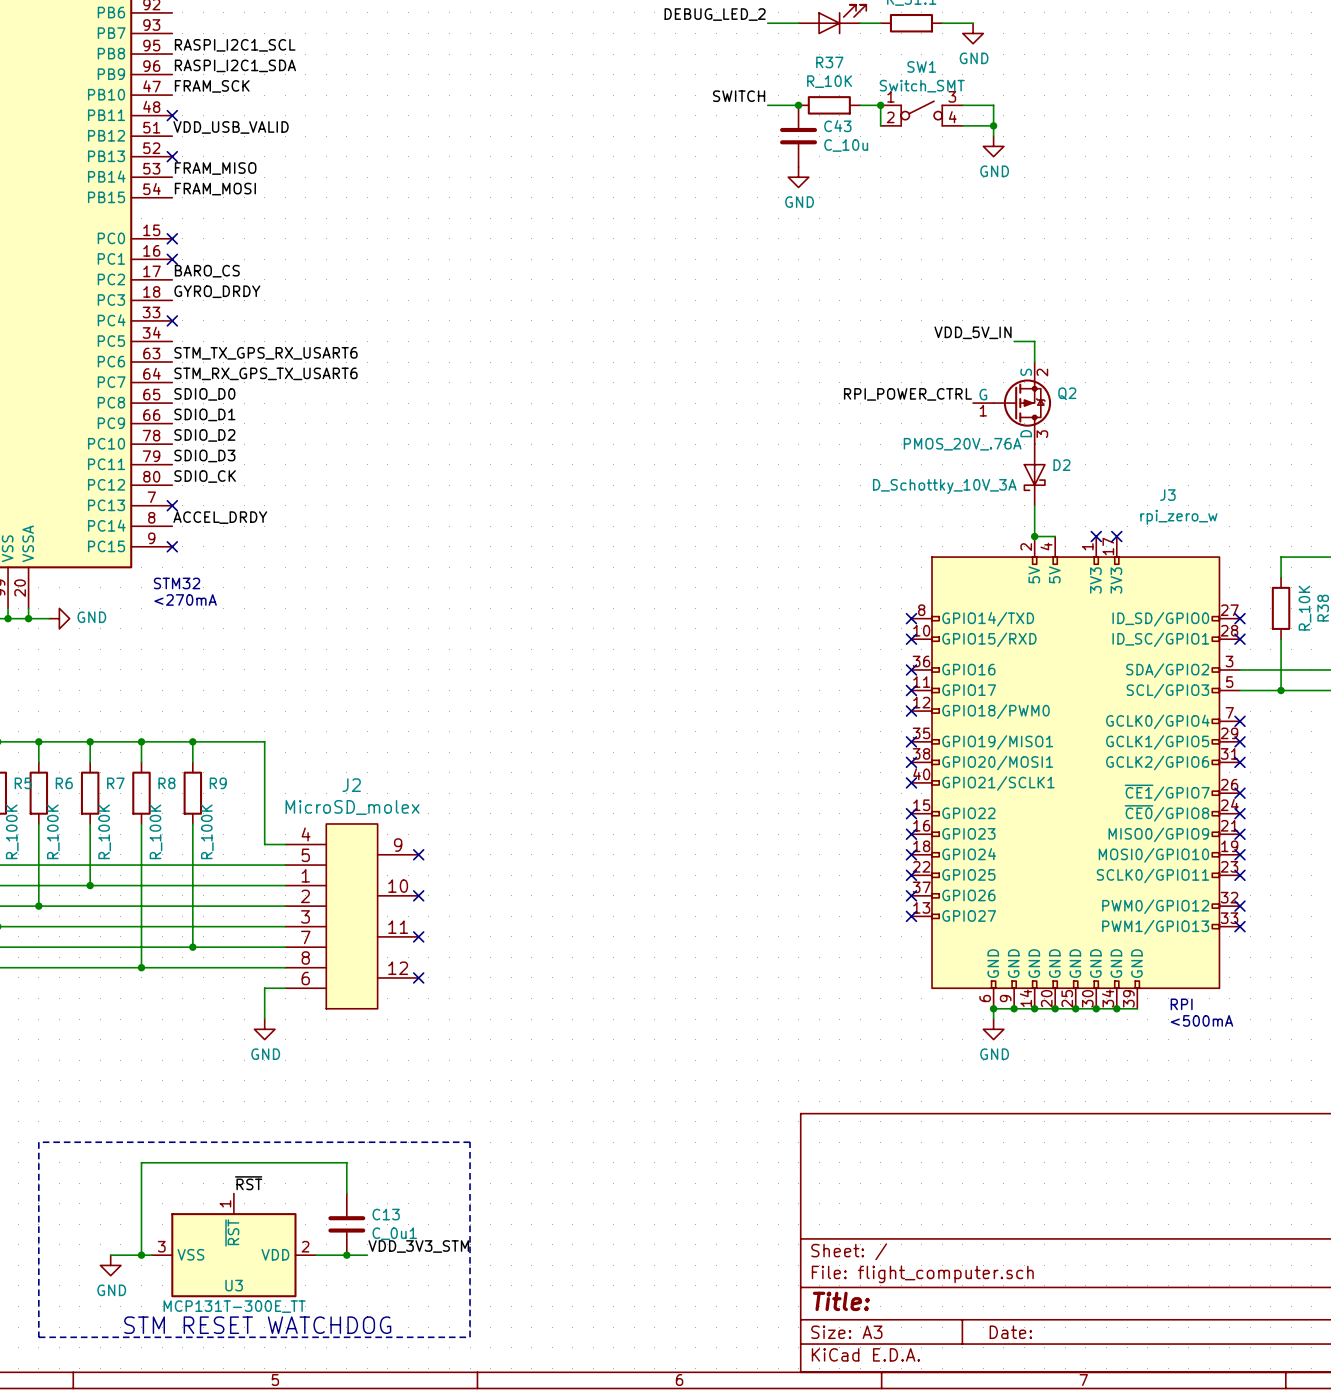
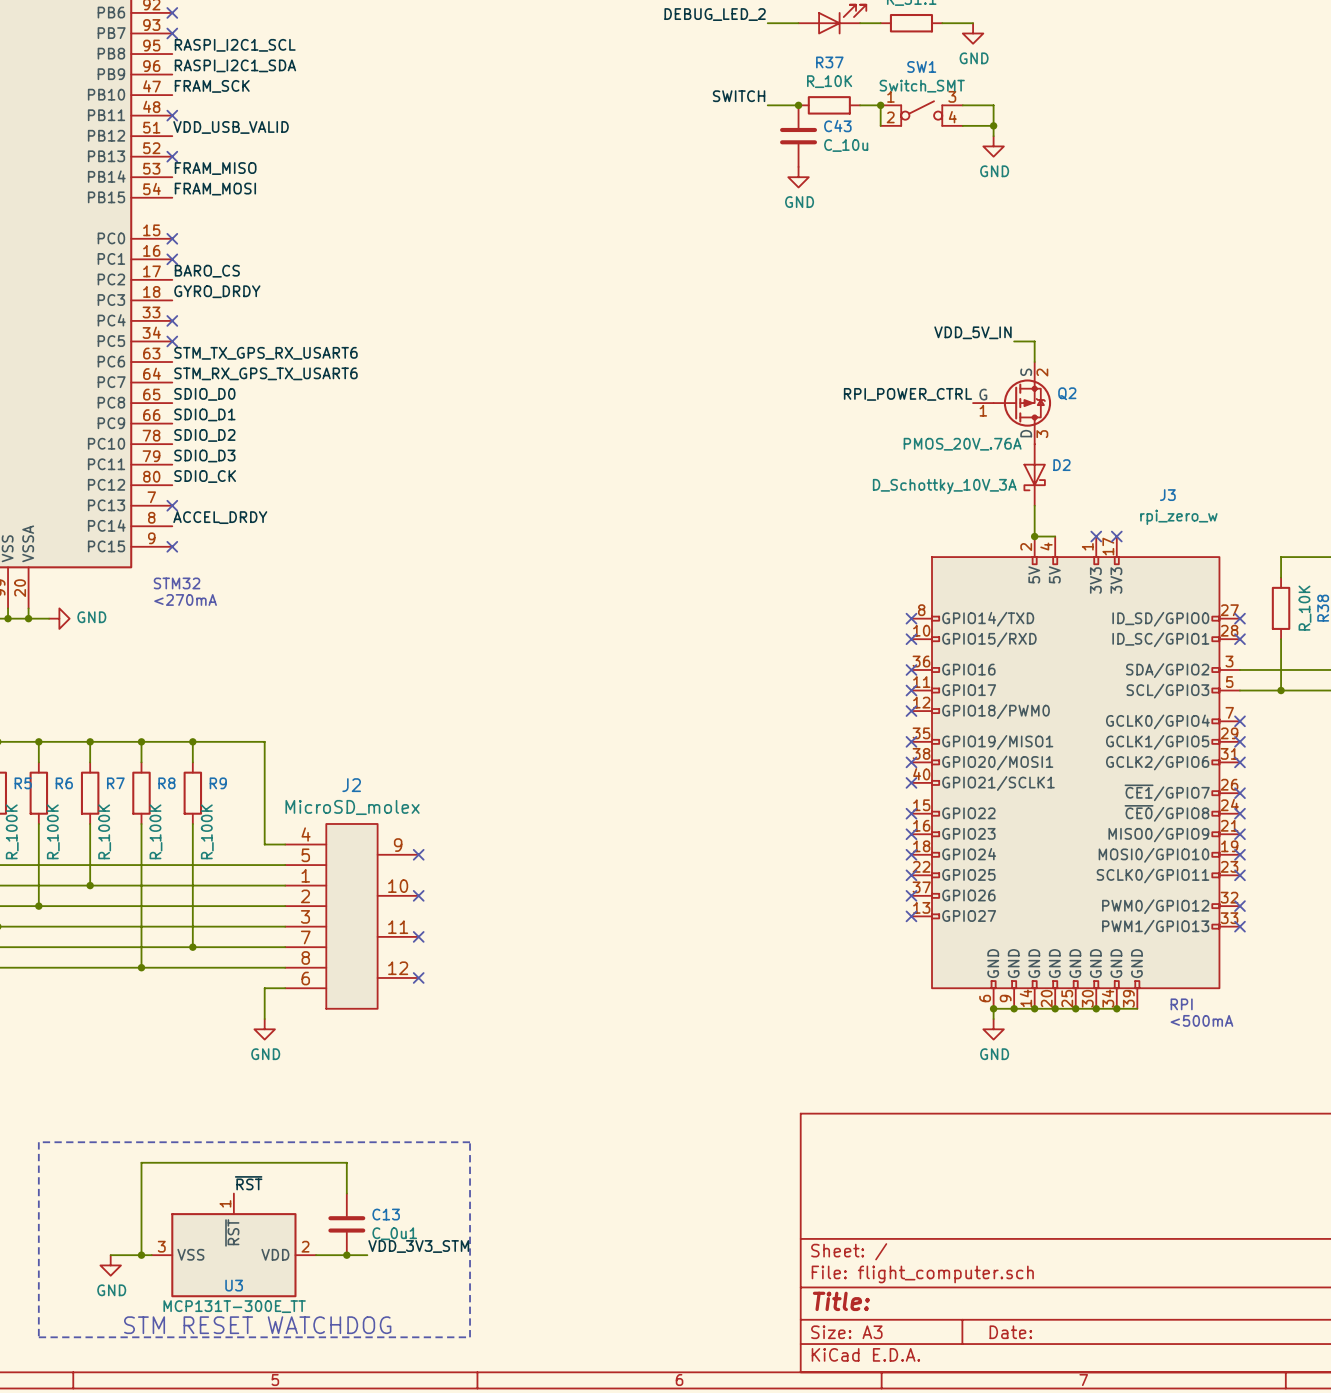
no-connect mark: none -> (172, 12)
no-connect mark: none -> (172, 33)
no-connect mark: none -> (172, 341)

